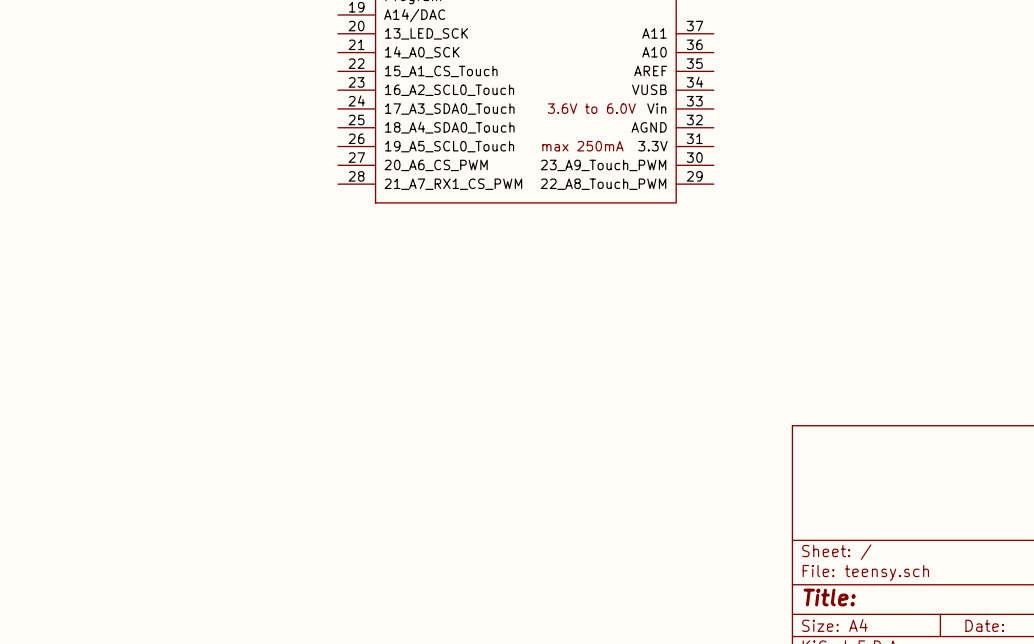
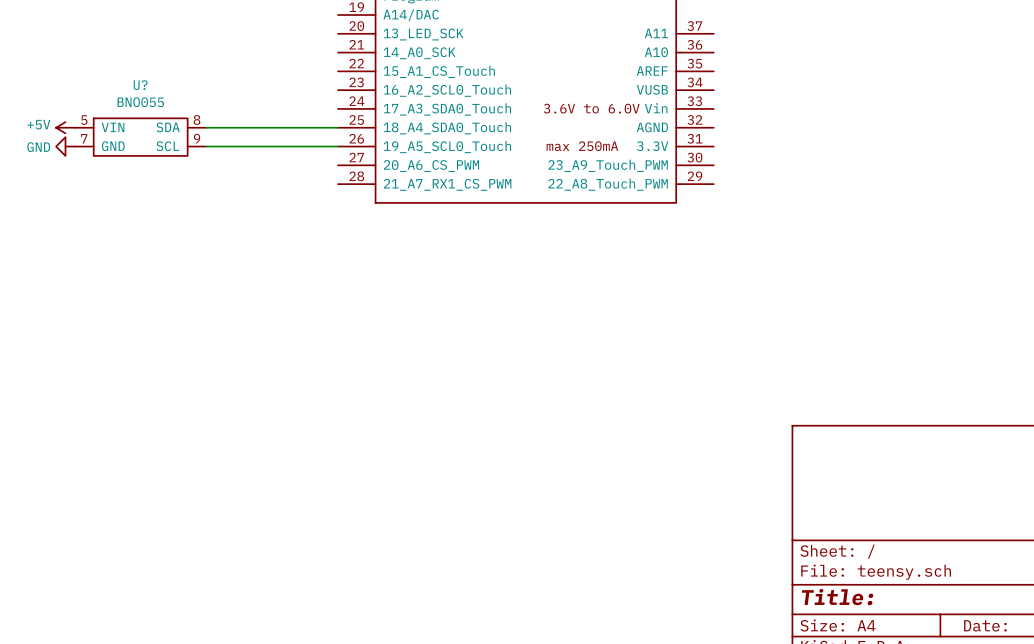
power symbol: none -> +5V (65, 127)
wire: none -> (206, 127) (337, 127)
U?: none -> BNO055 (140, 137)
power symbol: none -> GND (65, 146)
wire: none -> (206, 146) (337, 146)

